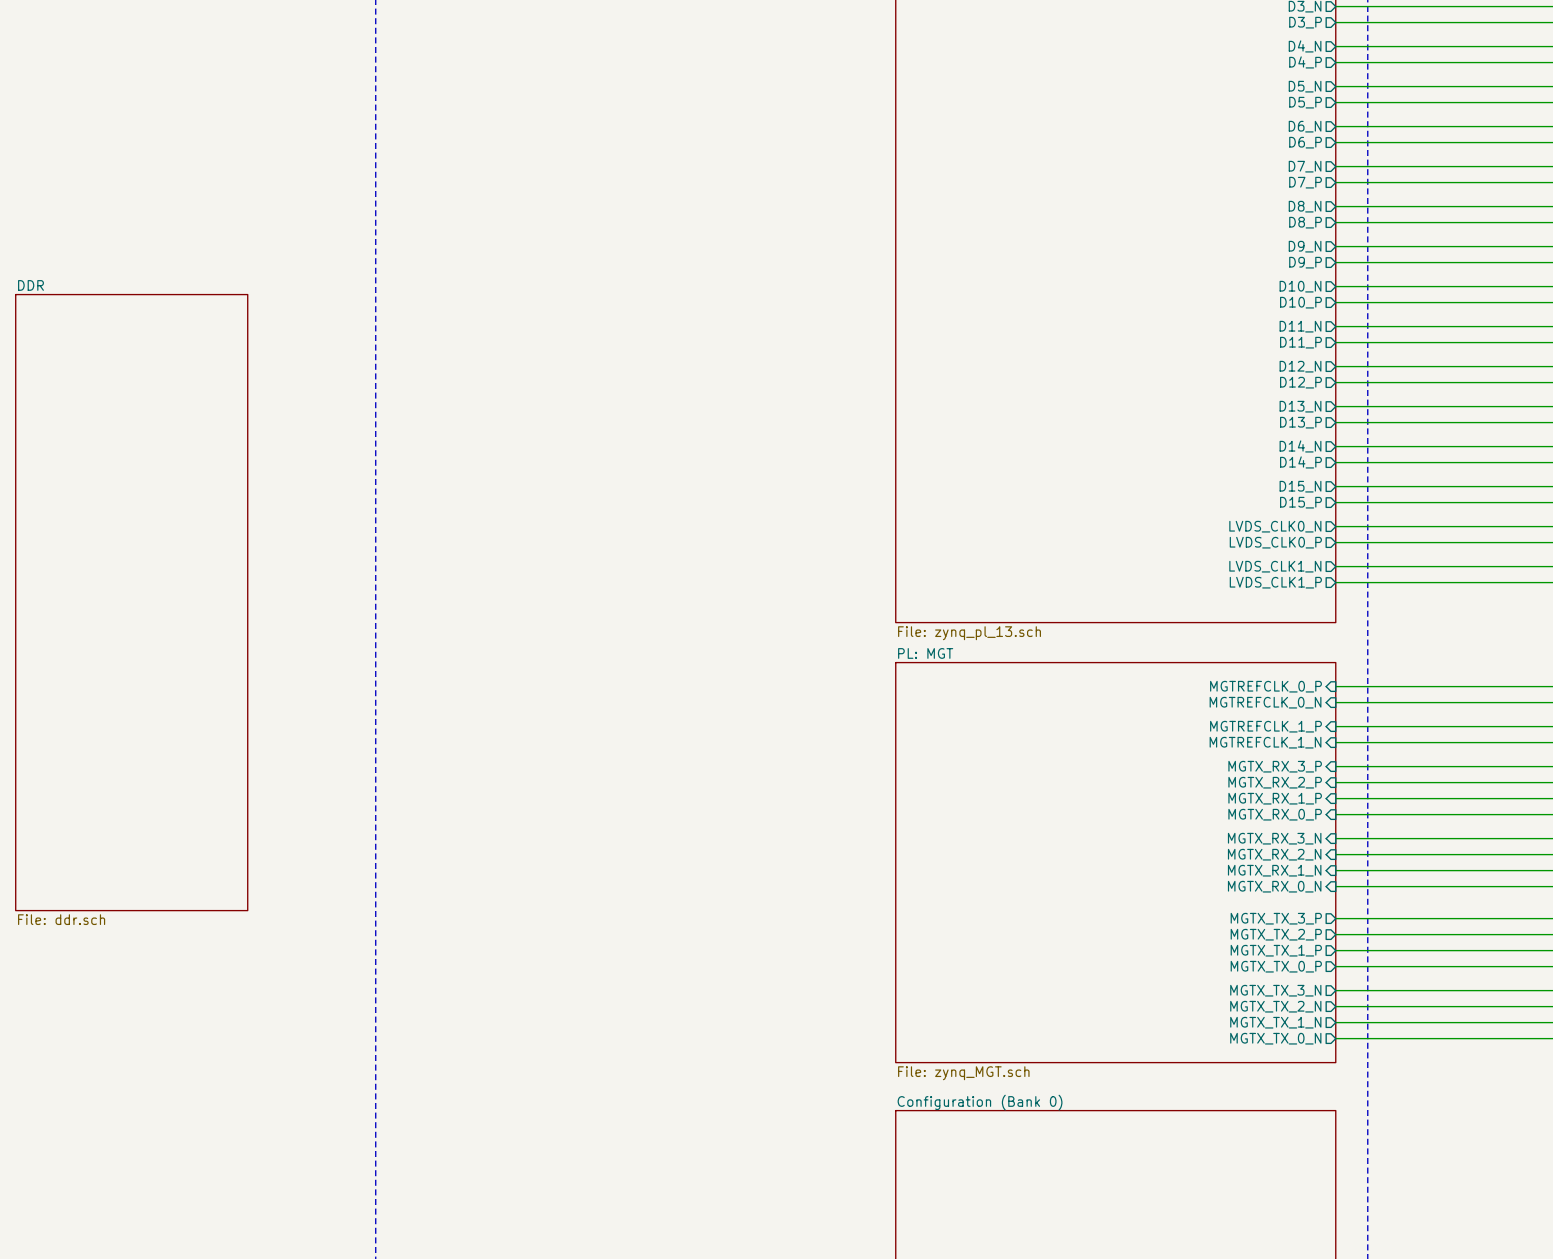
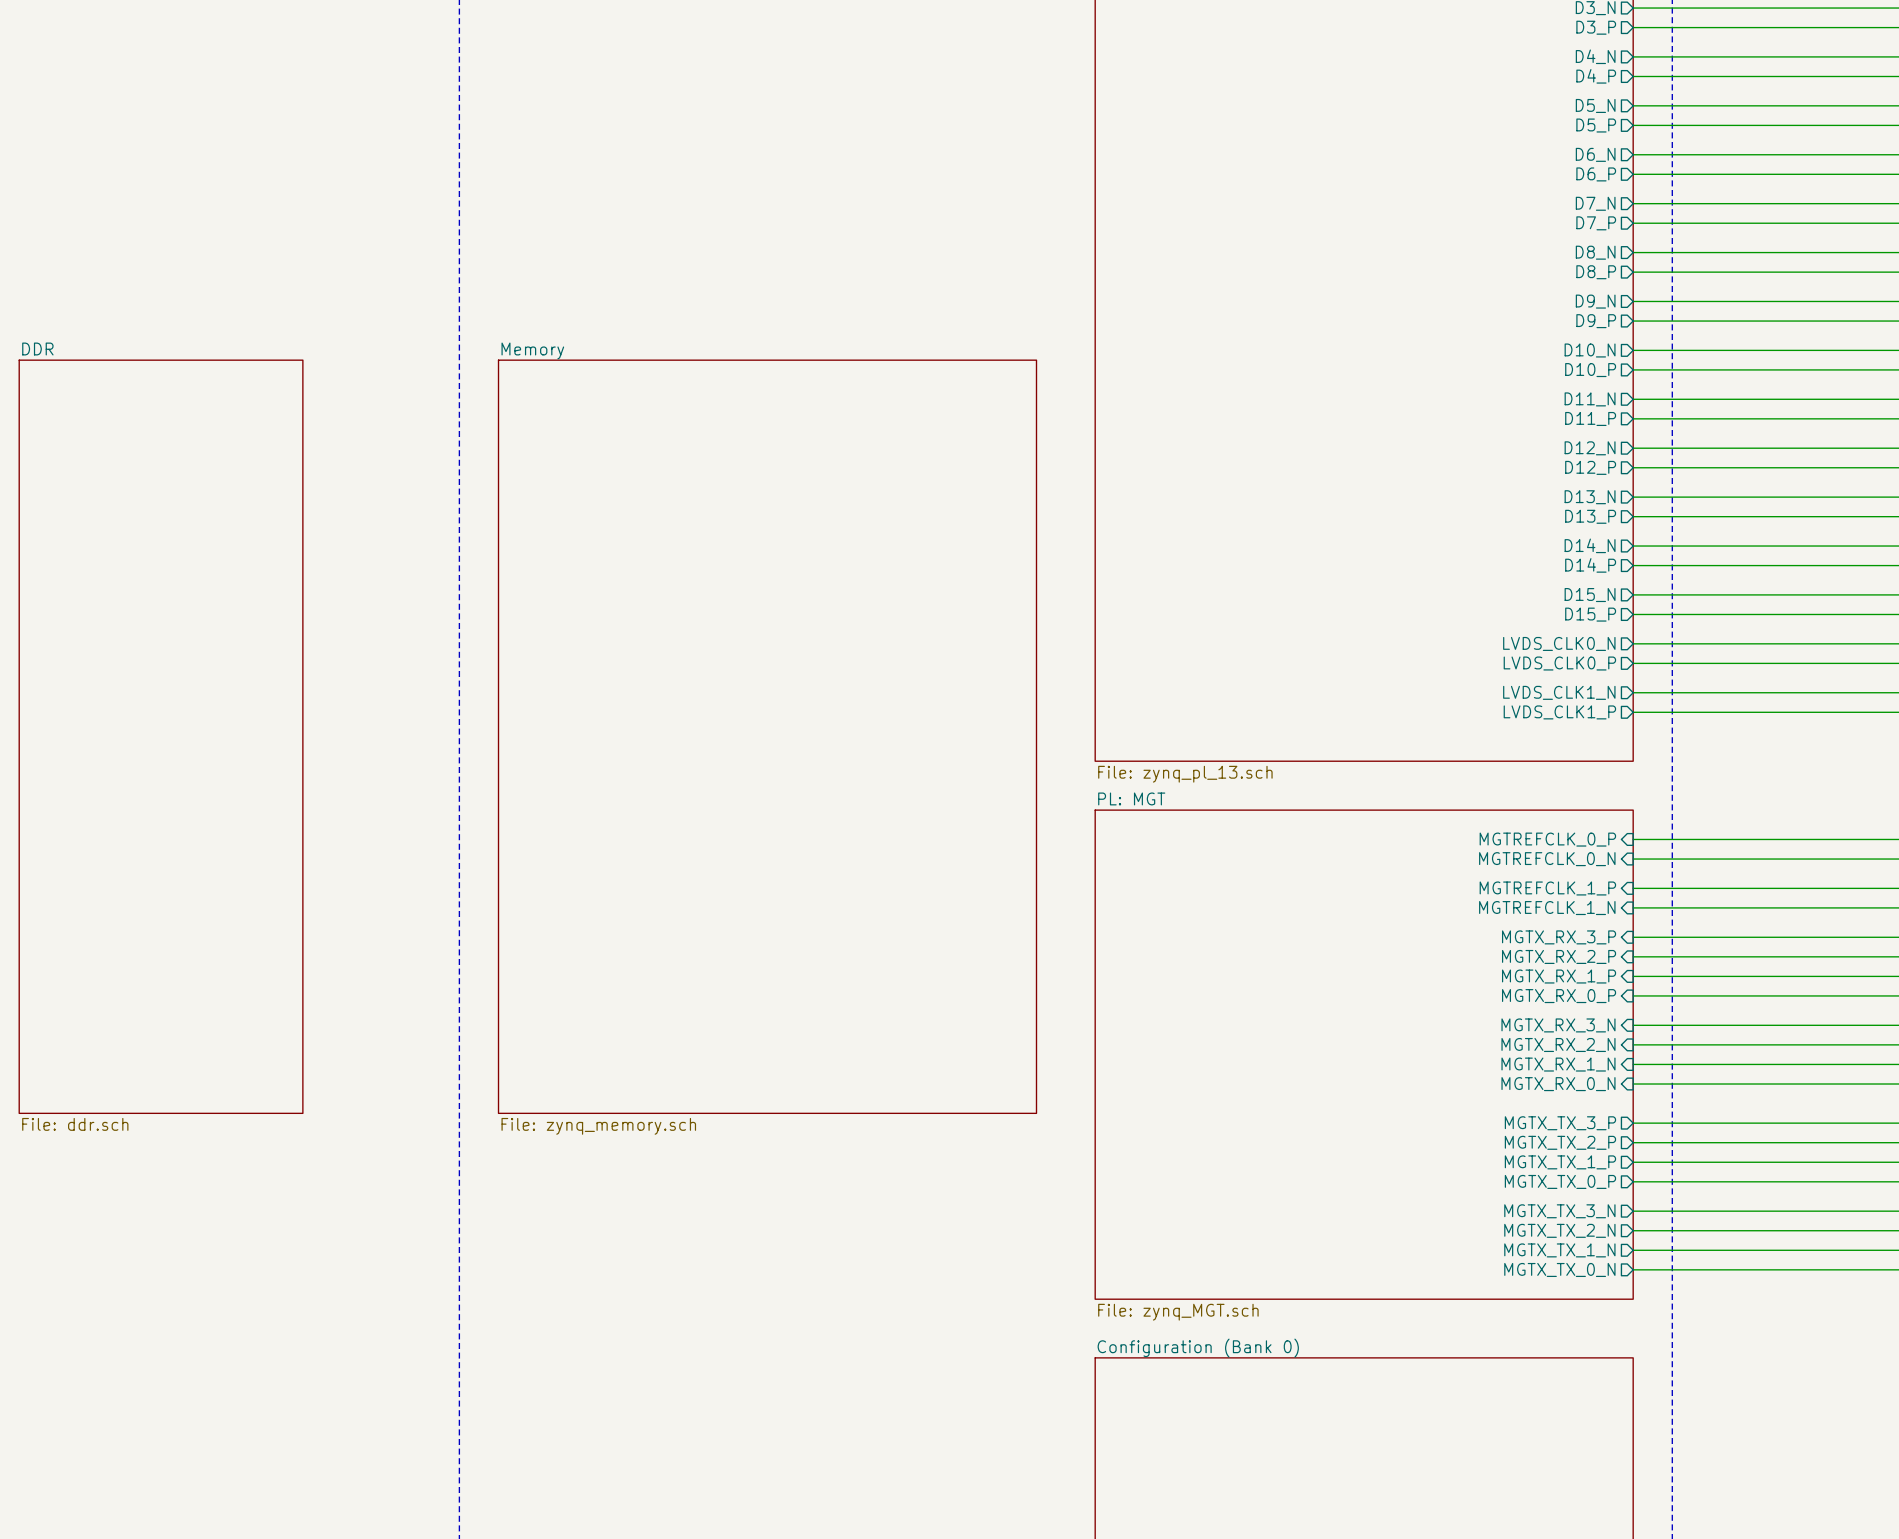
sheet Memory: none -> File: zynq_memory.sch (767, 736)

